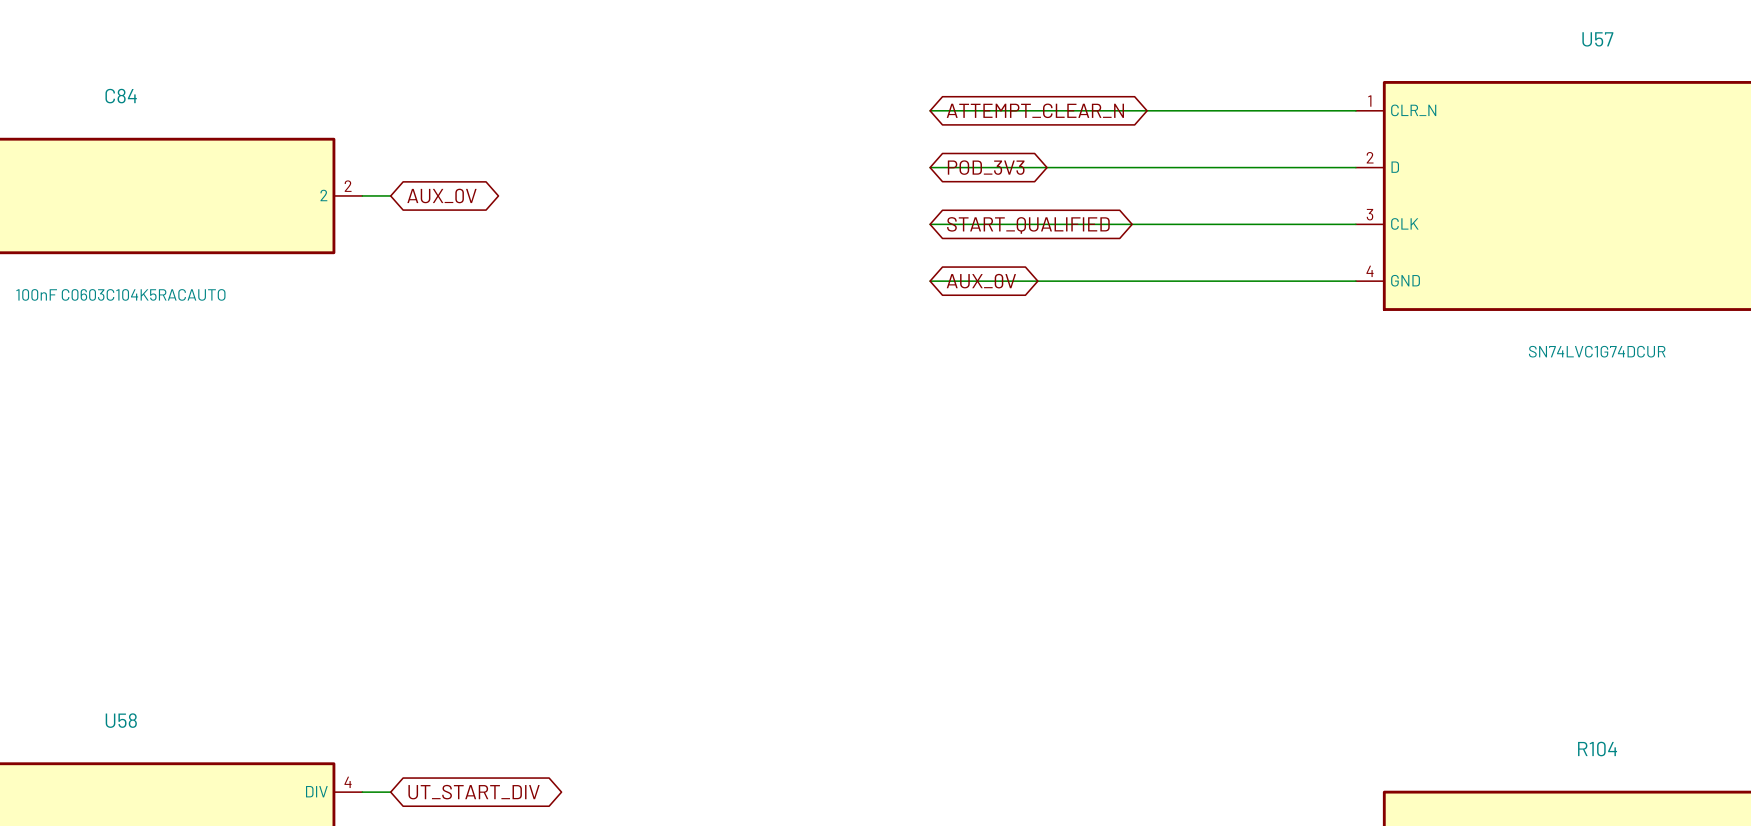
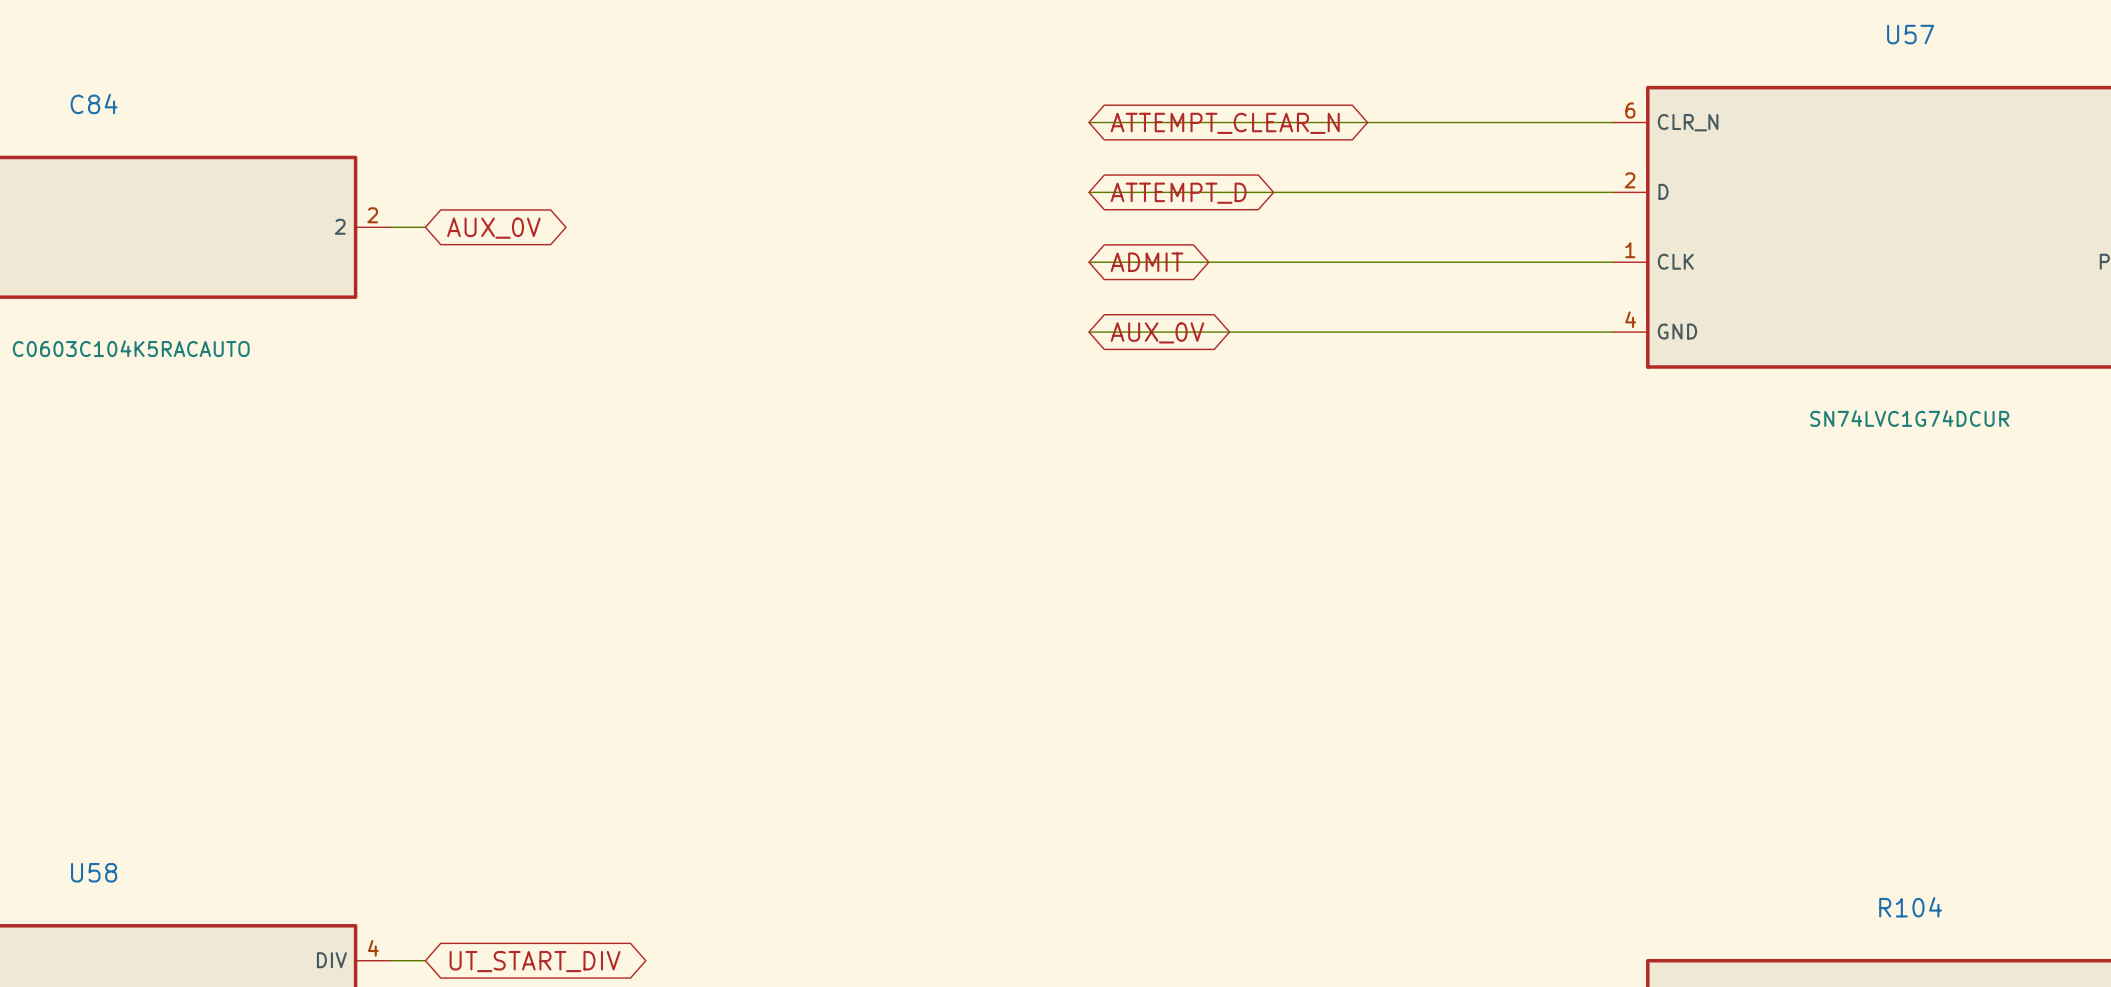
U57 pin number: 1 (1369, 101) -> 6 (1630, 110)
global label: POD_3V3 (986, 167) -> ATTEMPT_D (1178, 193)
U57 pin number: 3 (1369, 214) -> 1 (1630, 250)
global label: START_QUALIFIED (1028, 225) -> ADMIT (1147, 262)

